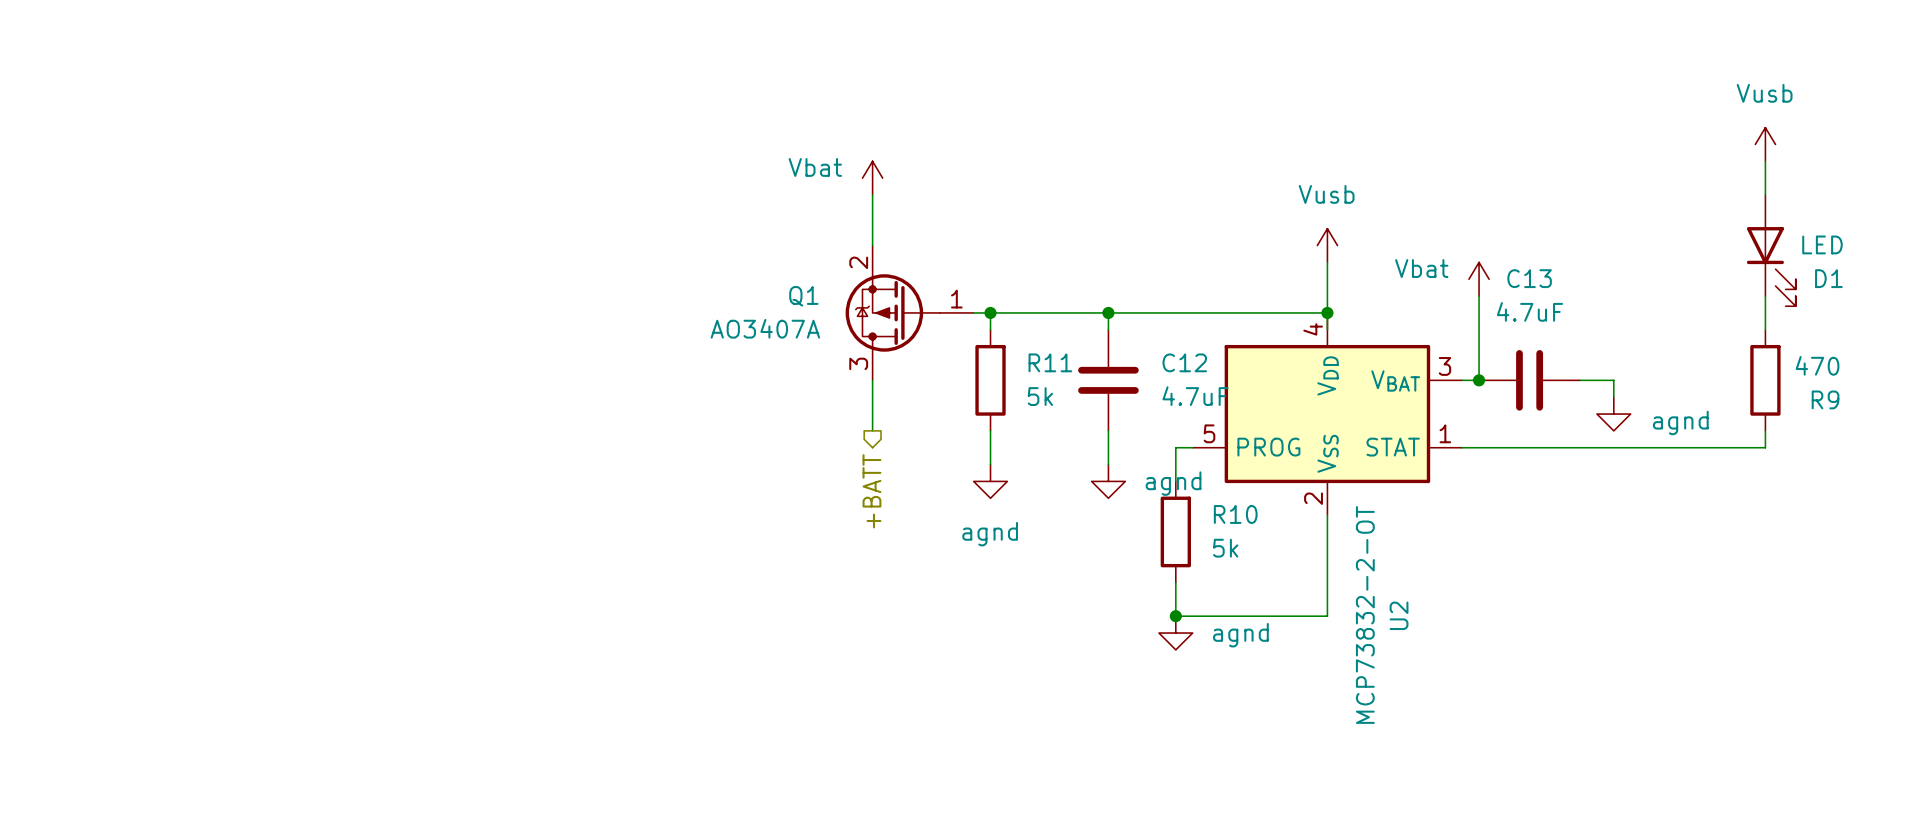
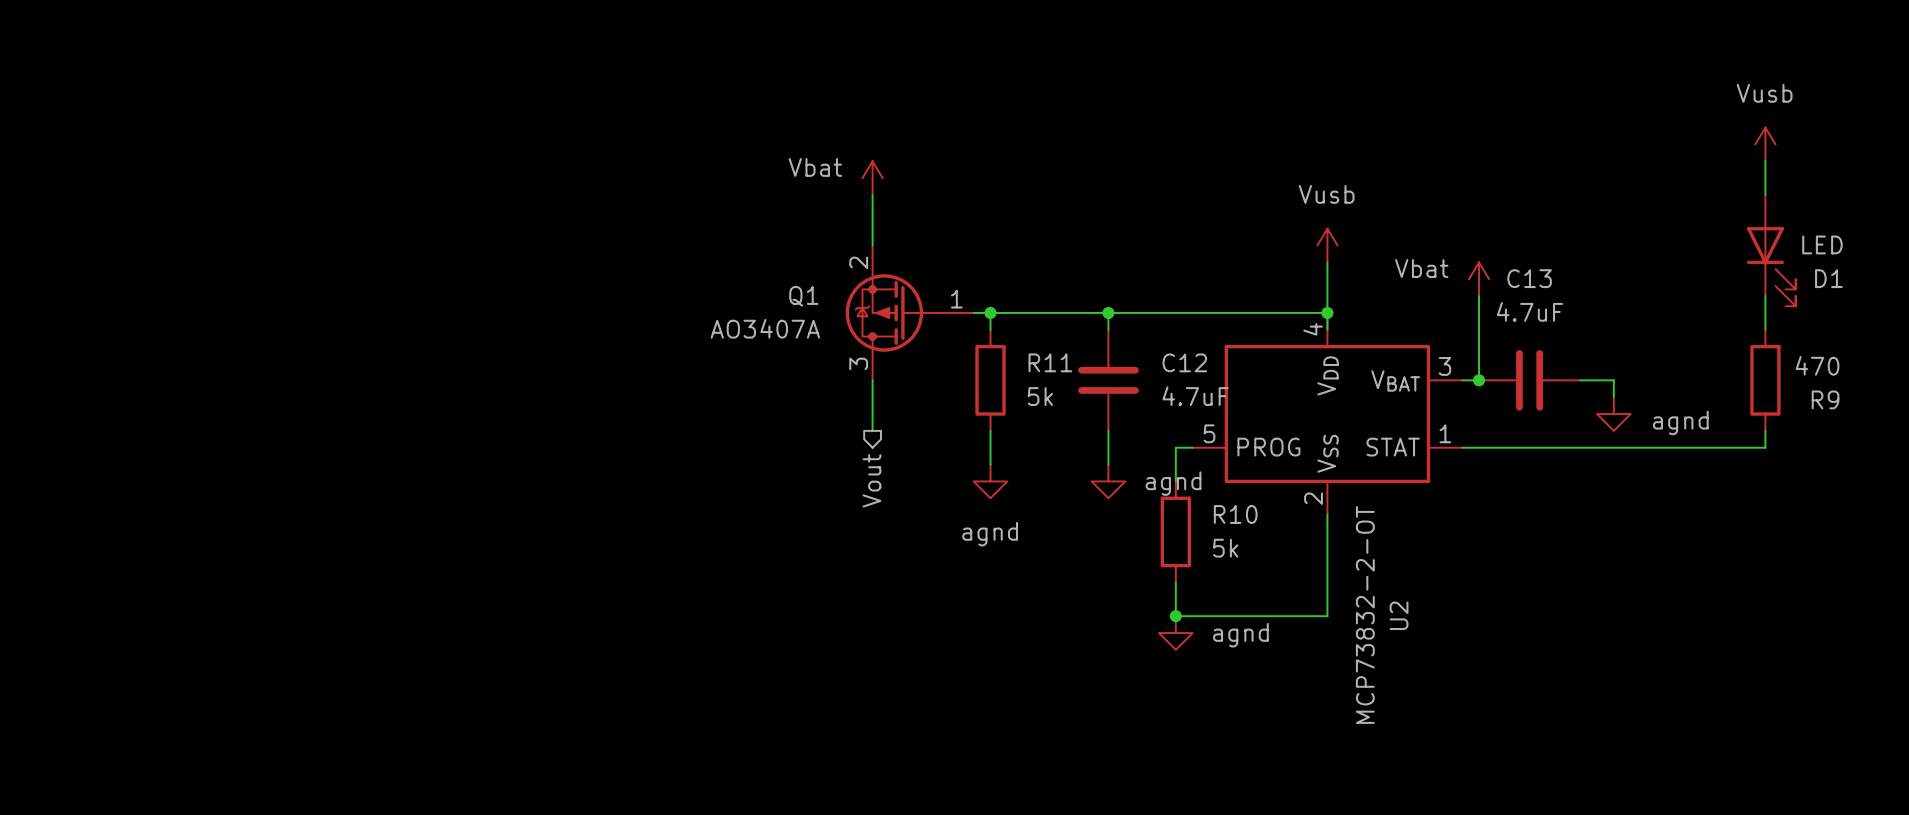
hierarchical label: +BATT (871, 491) -> Vout (871, 480)

